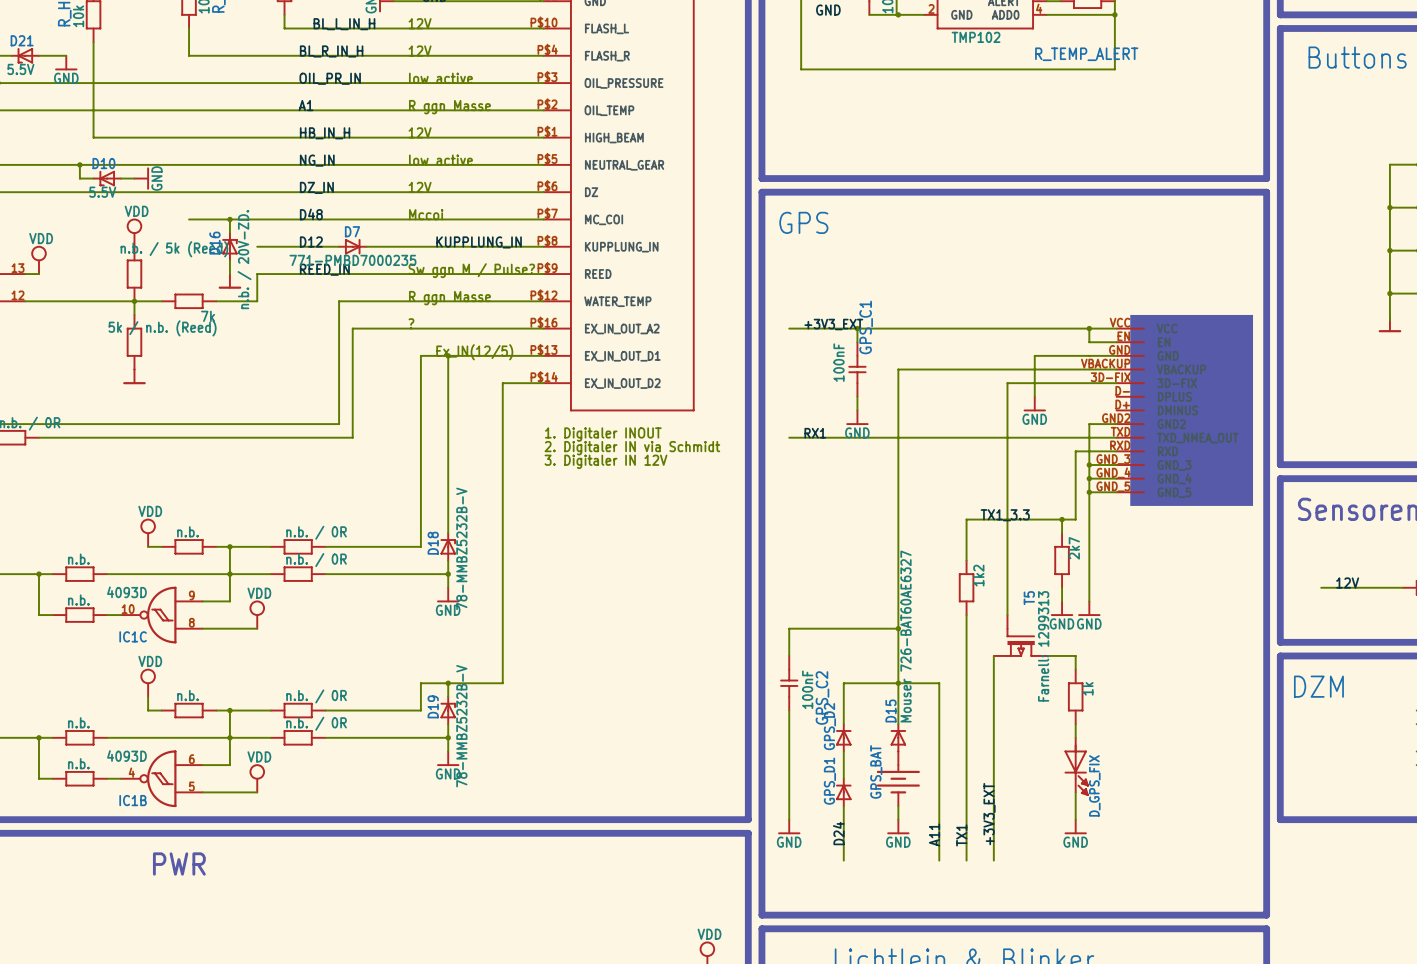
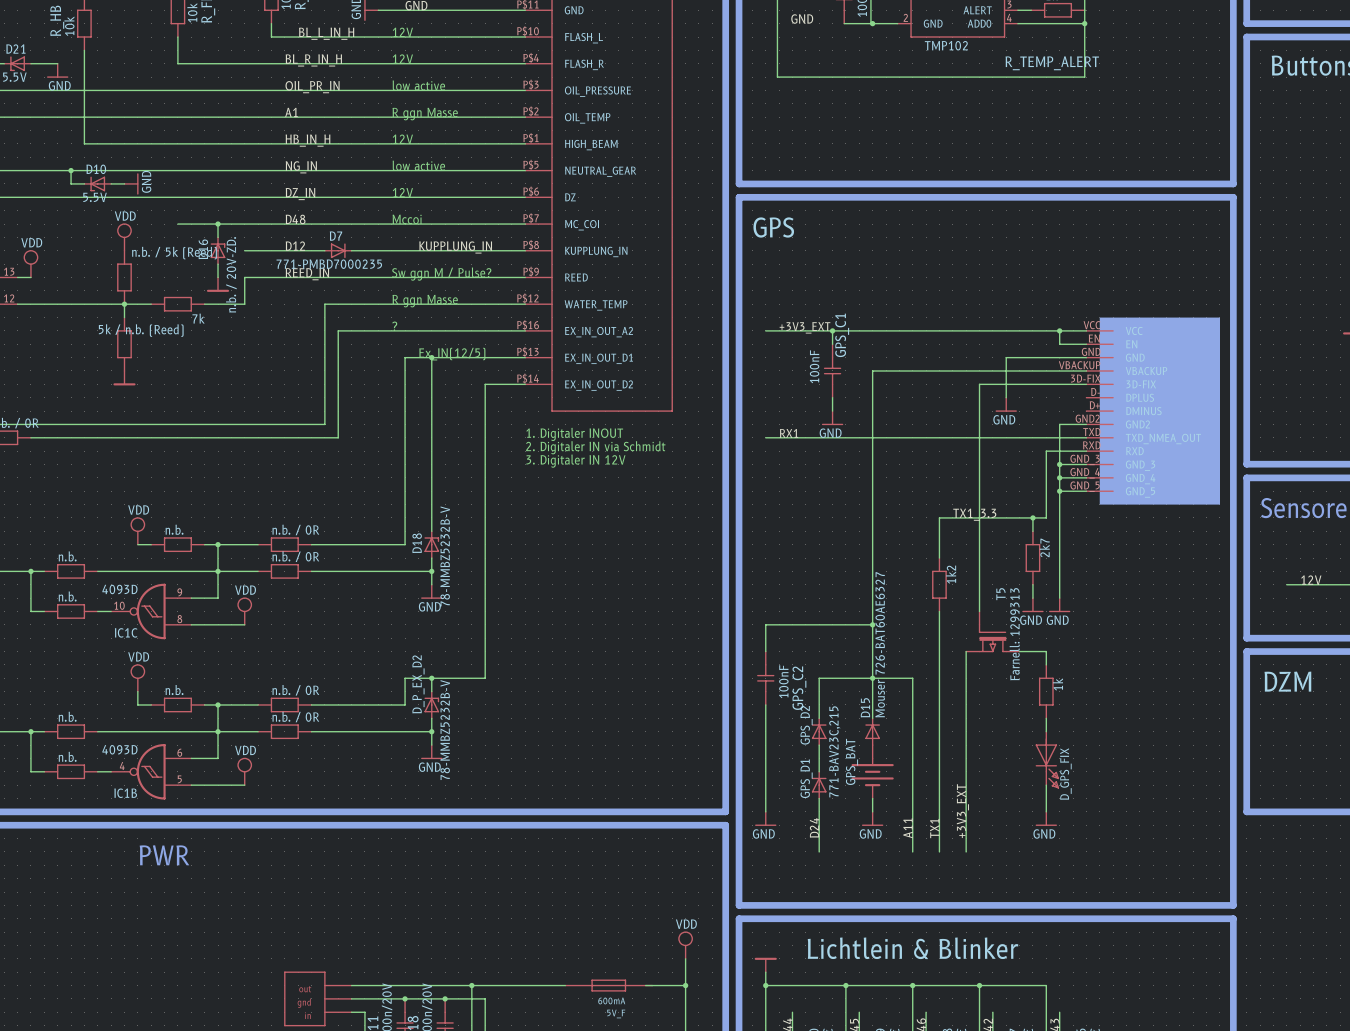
D19 name: D19 (433, 706) -> D_P_EX_D2 (418, 684)
GPS_D1 value: none -> 771-BAV23C,215 (834, 751)

